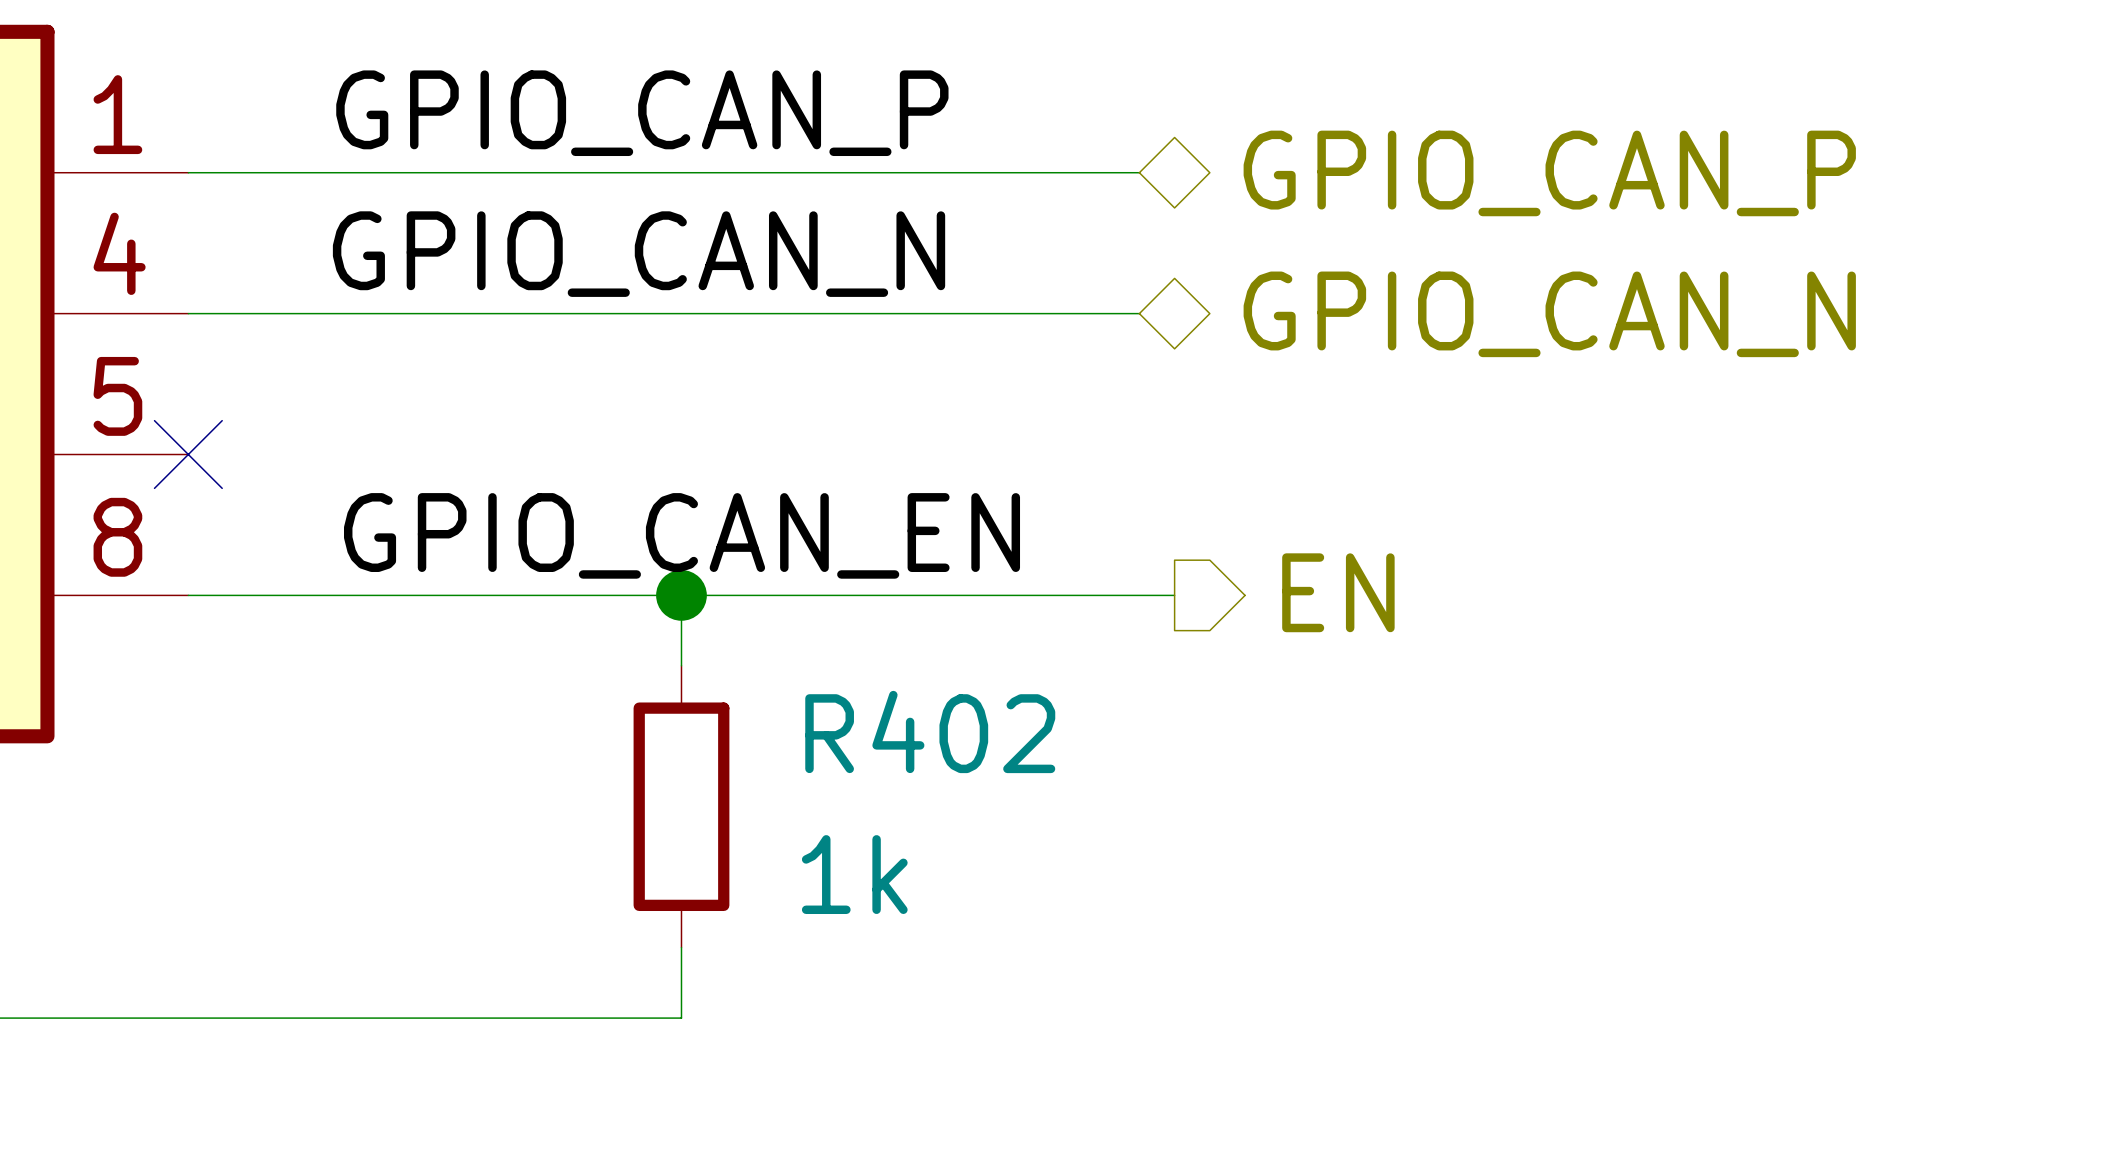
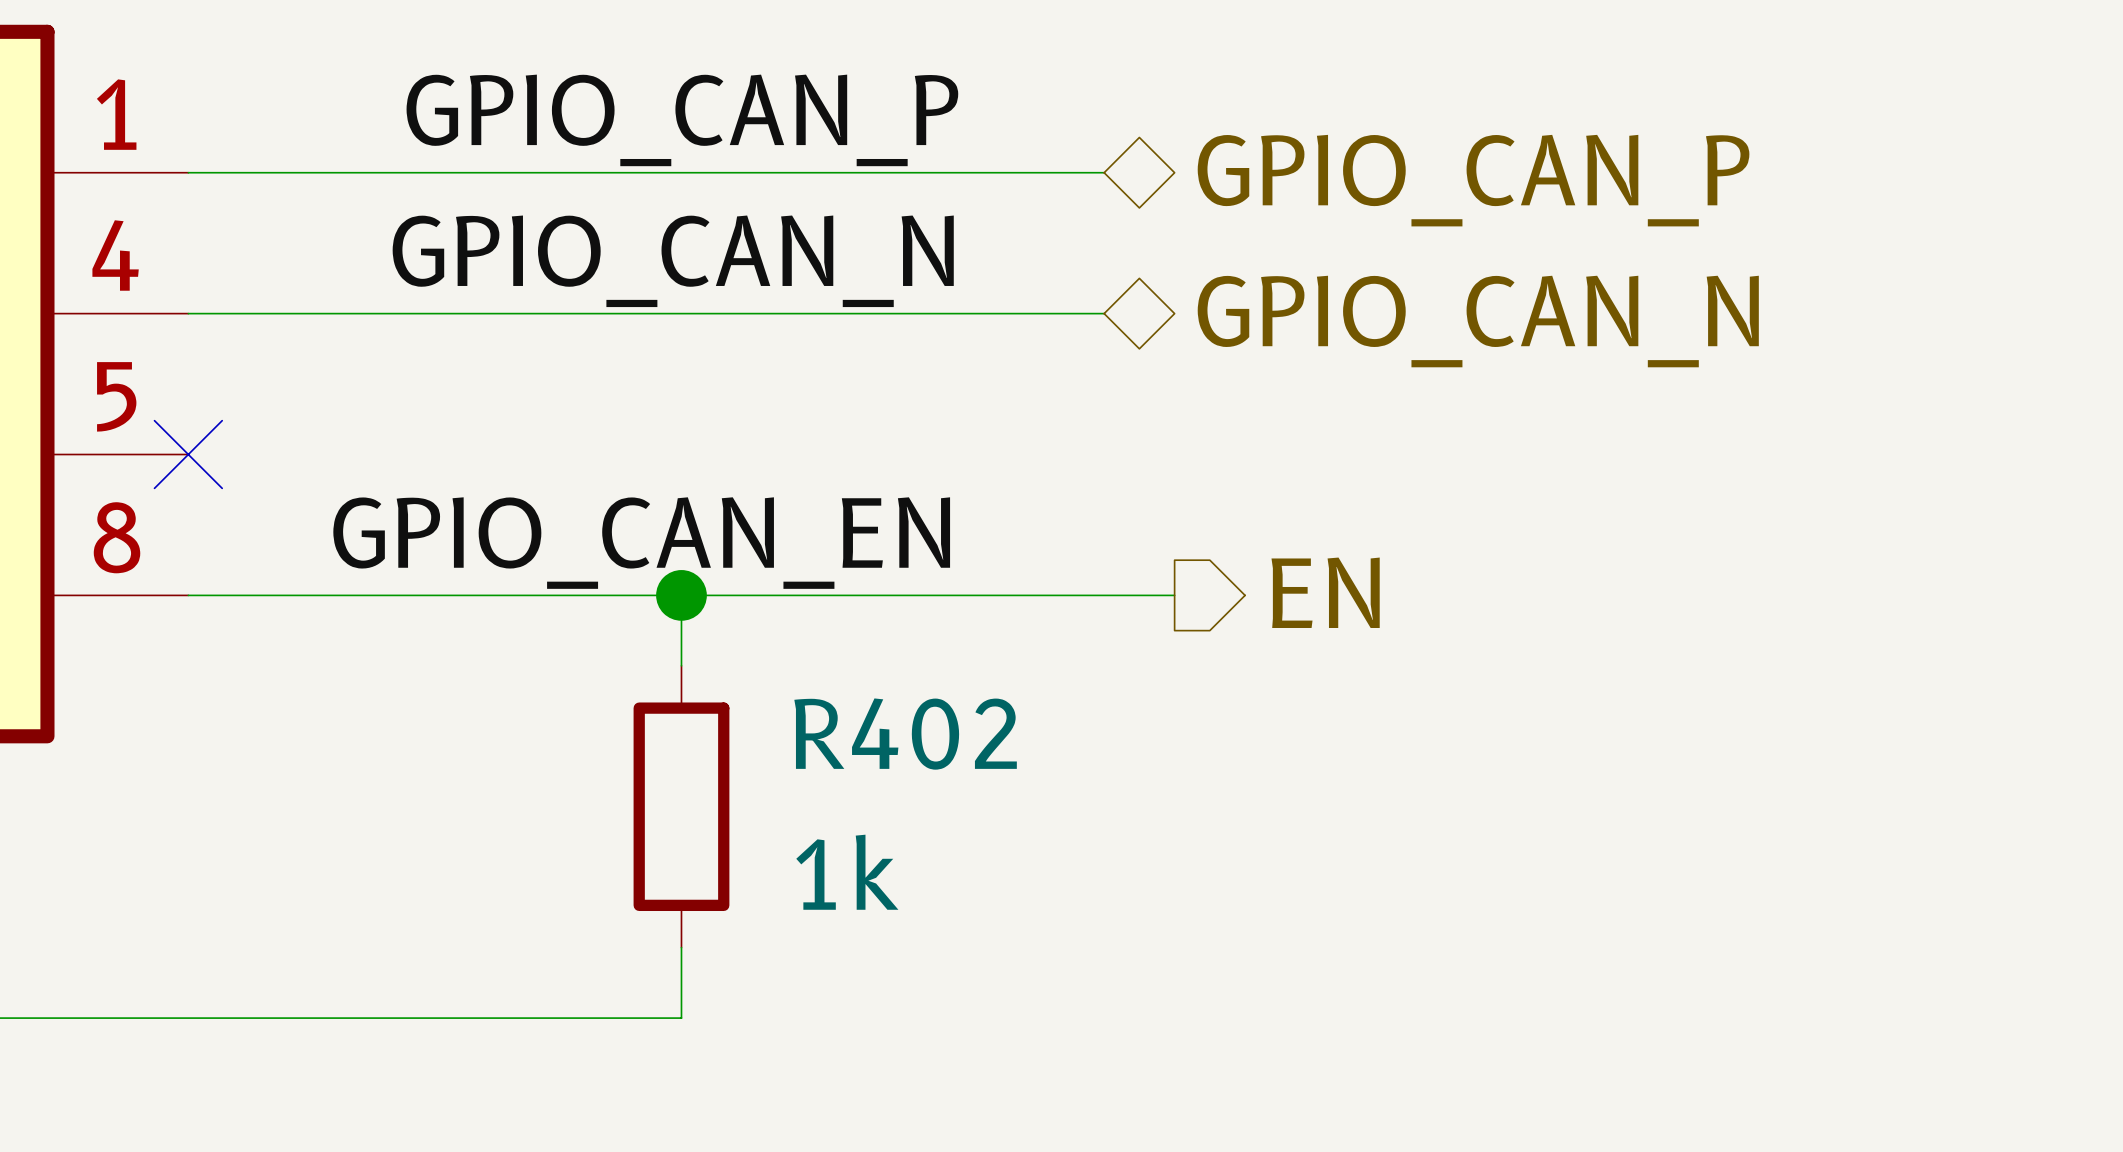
wire: (1104, 172) (1139, 172) -> none
hierarchical label position: GPIO_CAN_P (1549, 173) -> GPIO_CAN_P (1473, 180)
wire: (1104, 313) (1139, 313) -> none
hierarchical label position: GPIO_CAN_N (1549, 314) -> GPIO_CAN_N (1478, 321)

